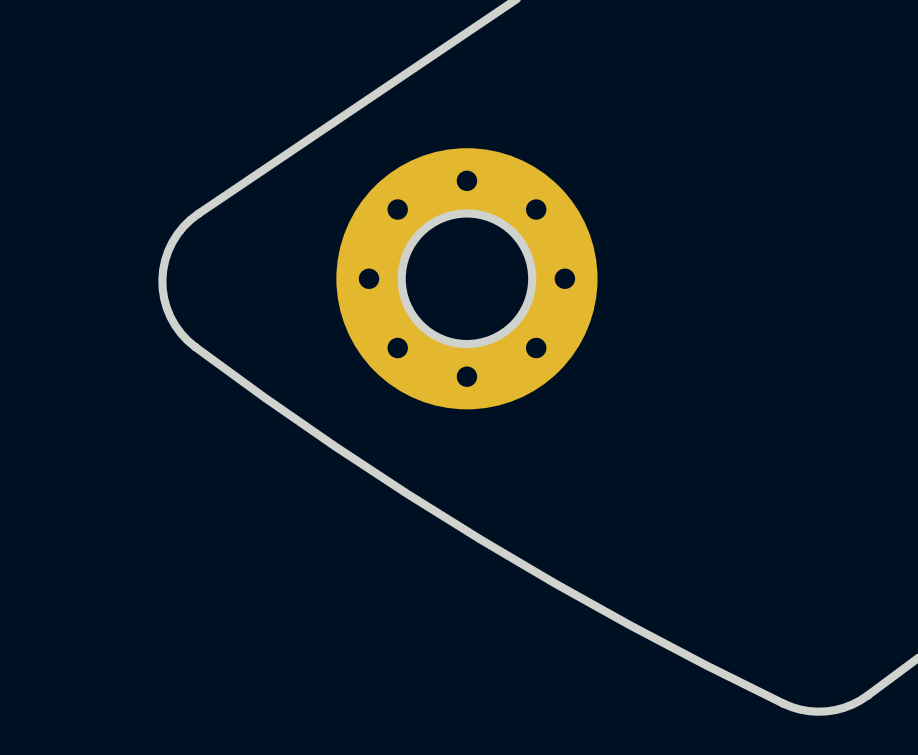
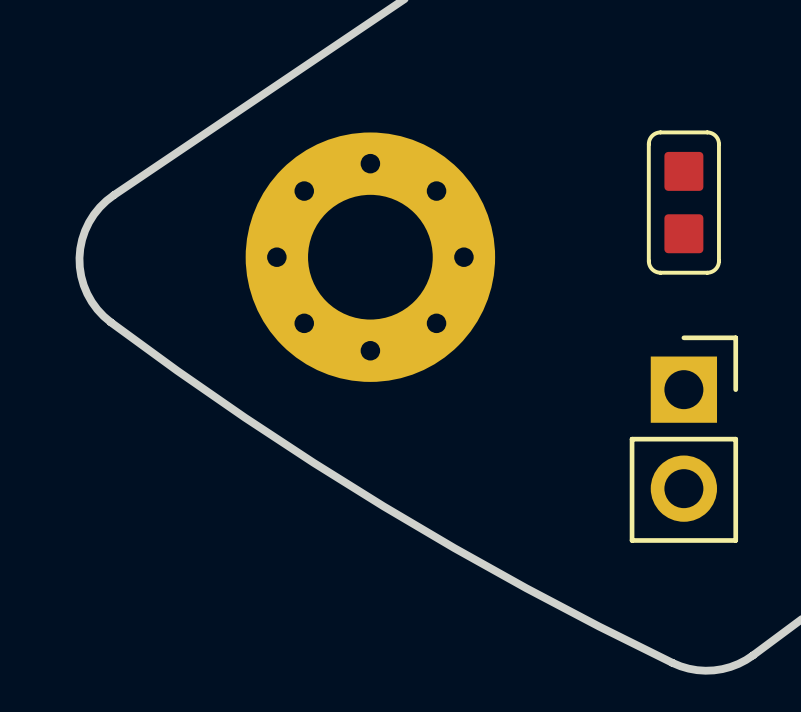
round board edge: [397, 209, 537, 349] -> none
part: none -> (683, 202)
part: none -> (683, 439)

